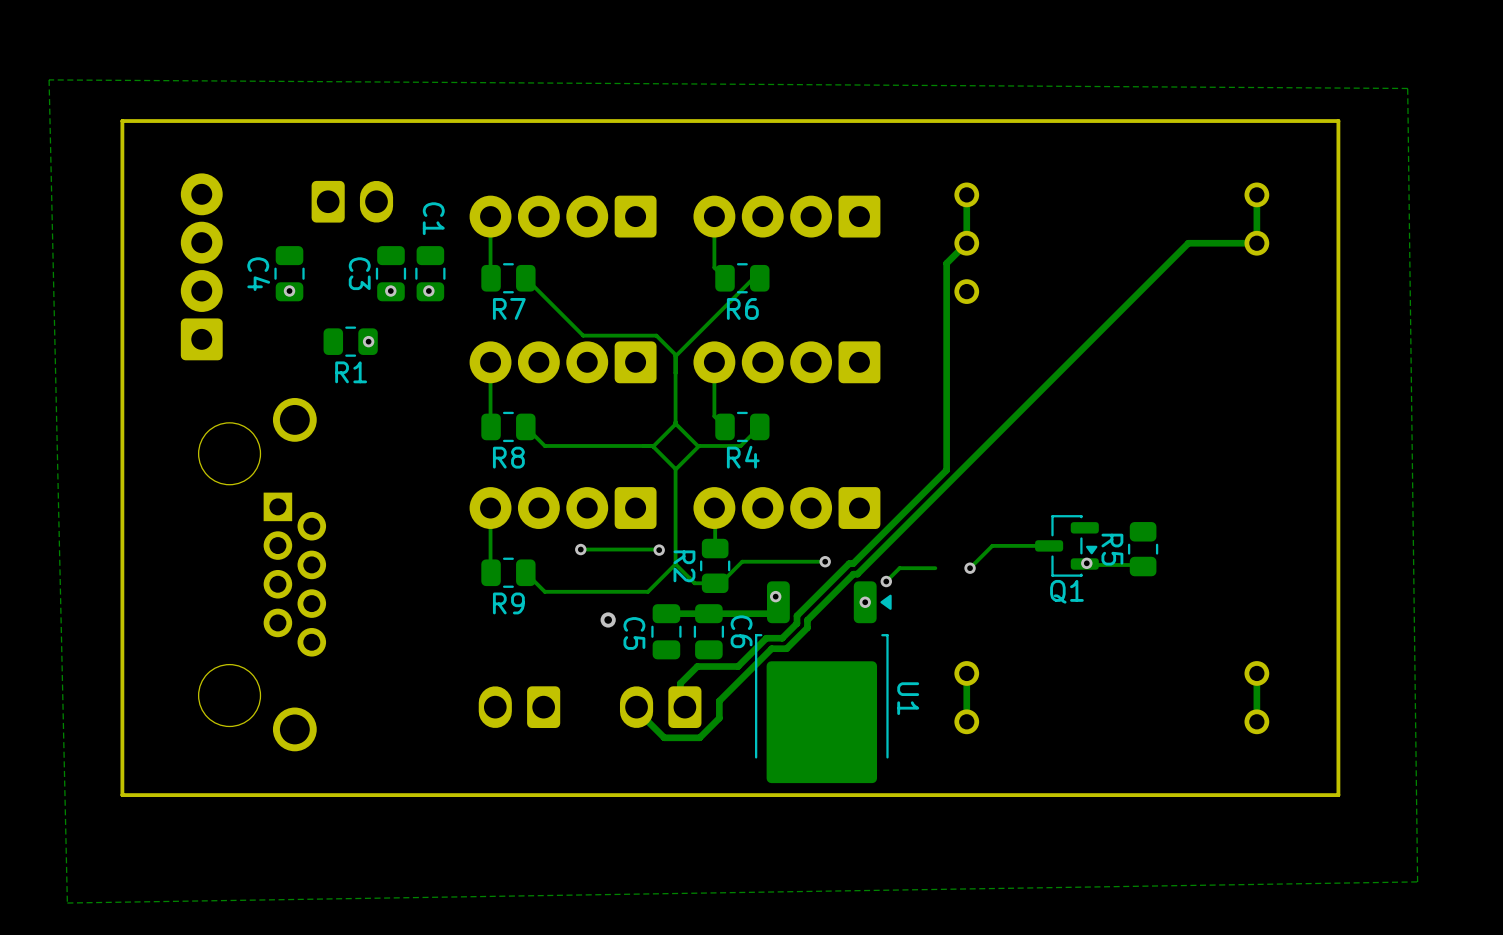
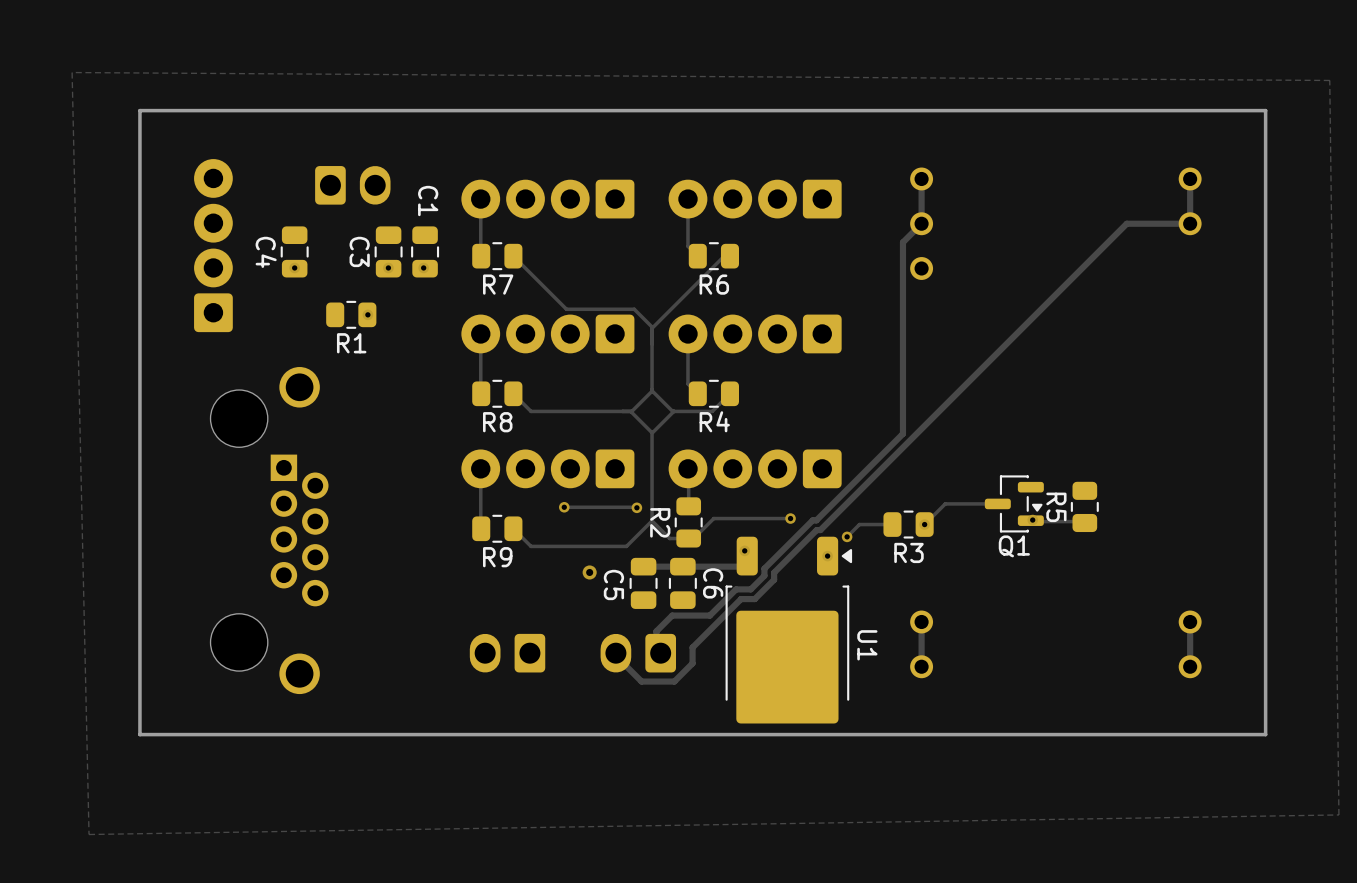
R3: none -> (908, 524)

